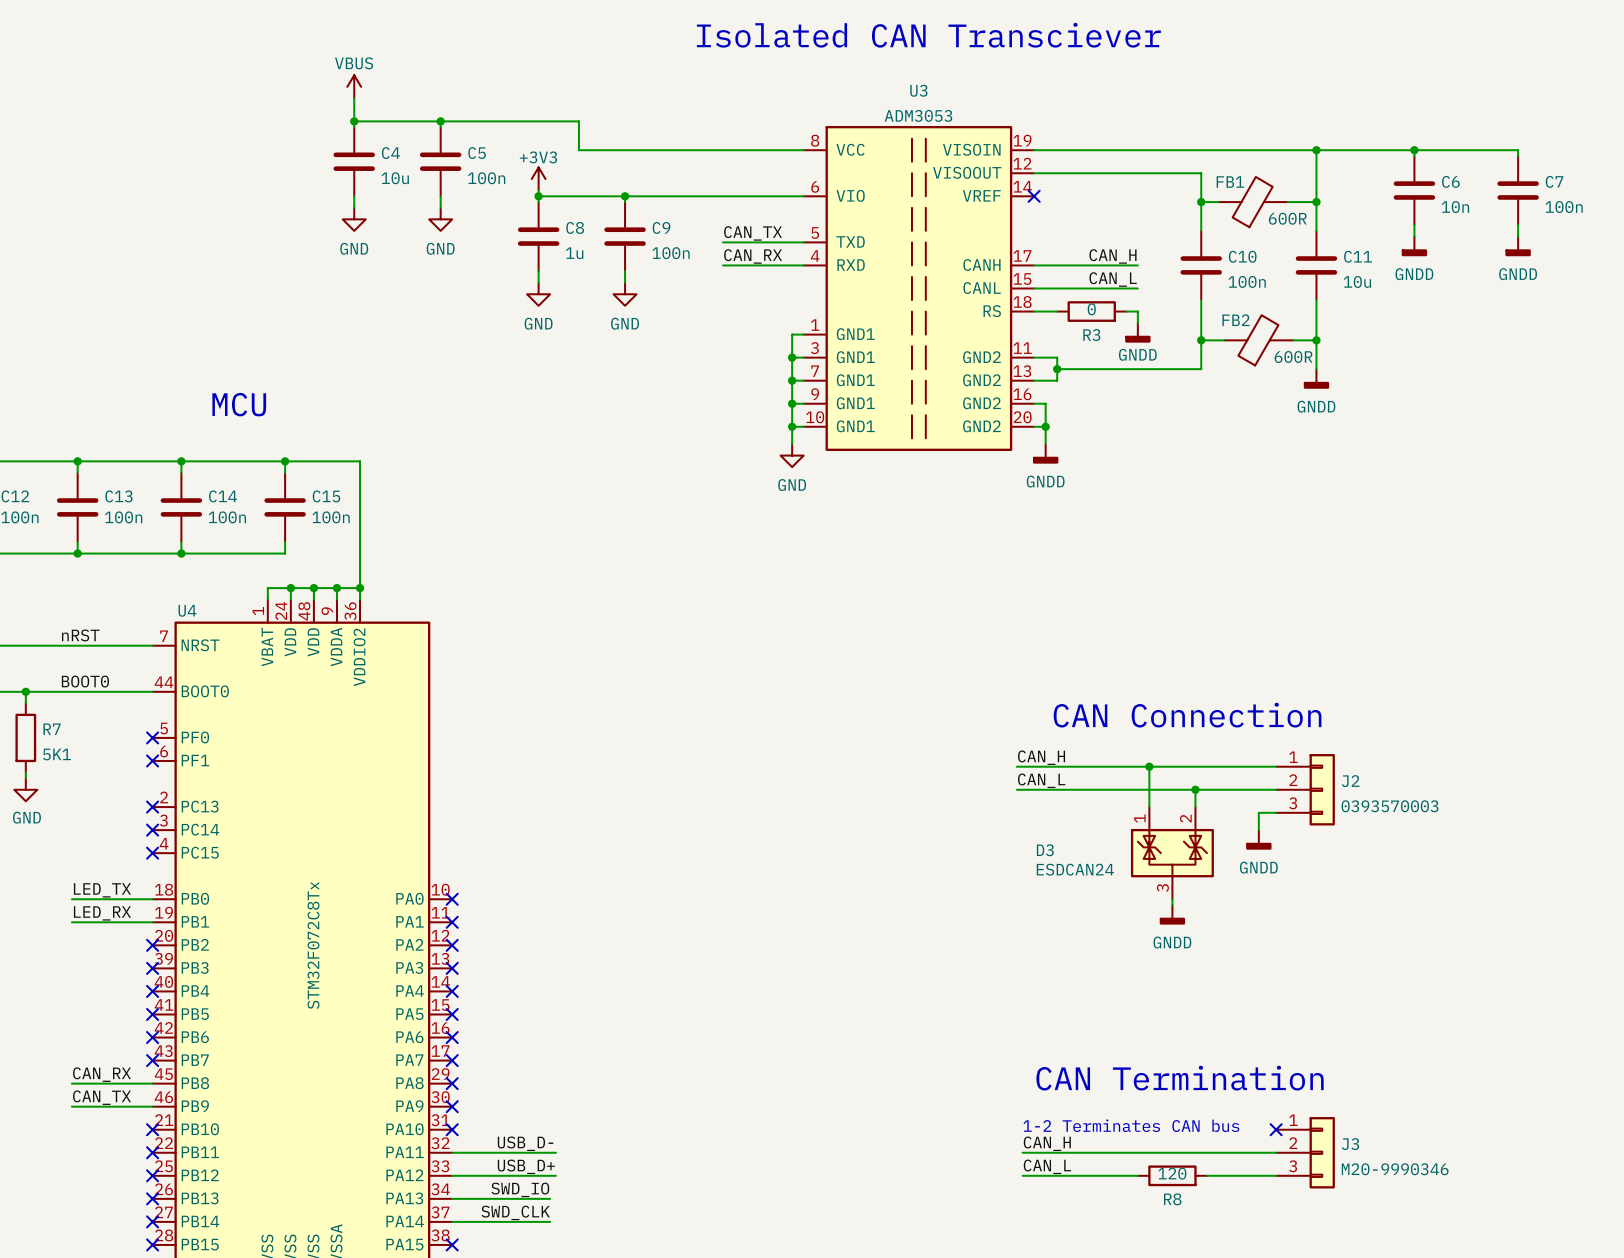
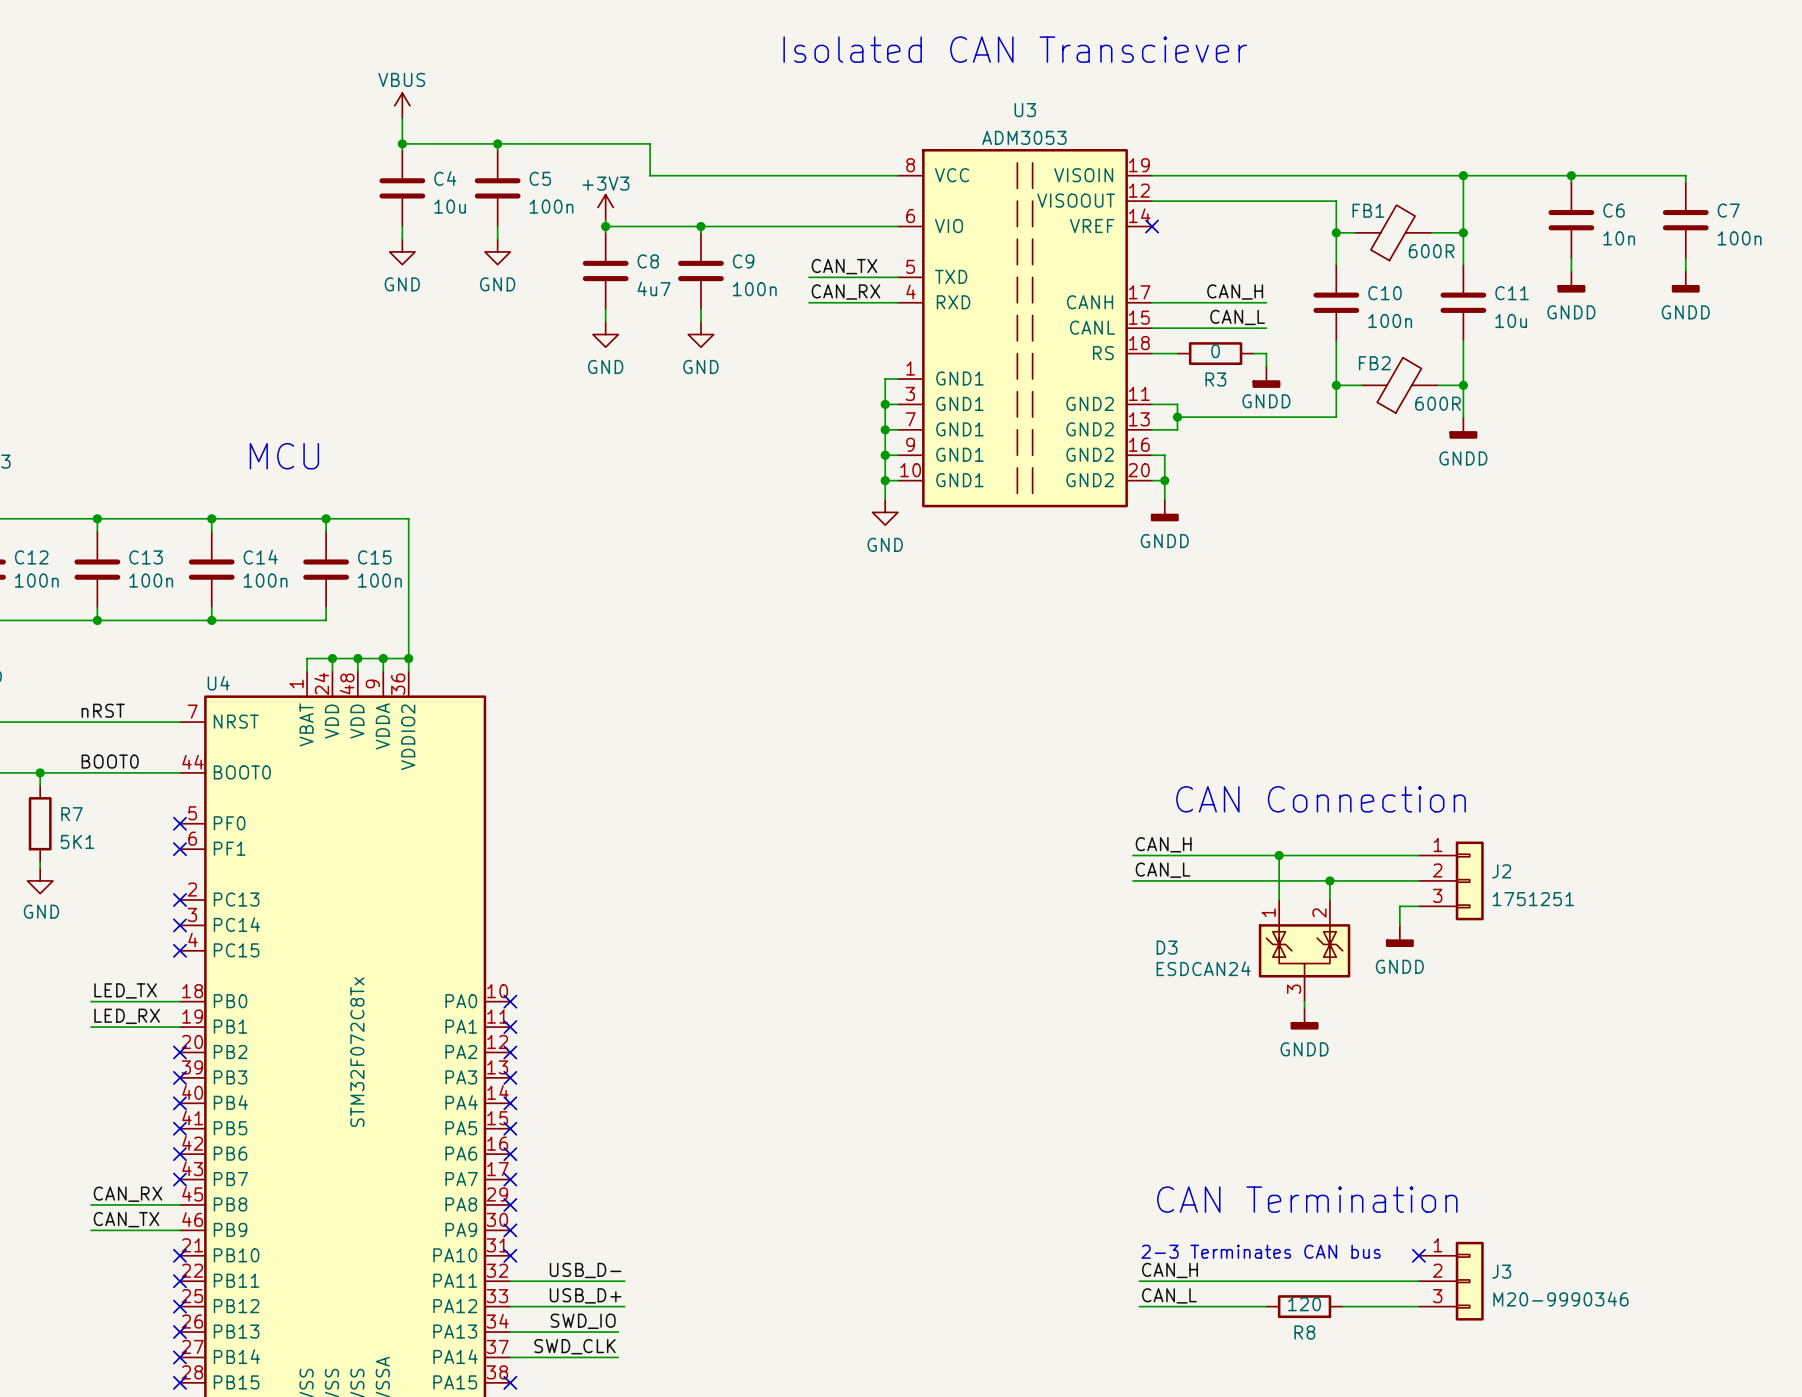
C8 value: 1u (574, 253) -> 4u7 (654, 288)
J2 value: 0393570003 (1389, 806) -> 1751251 (1533, 899)
text: 1-2 Terminates CAN bus (1131, 1125) -> 2-3 Terminates CAN bus (1261, 1251)

